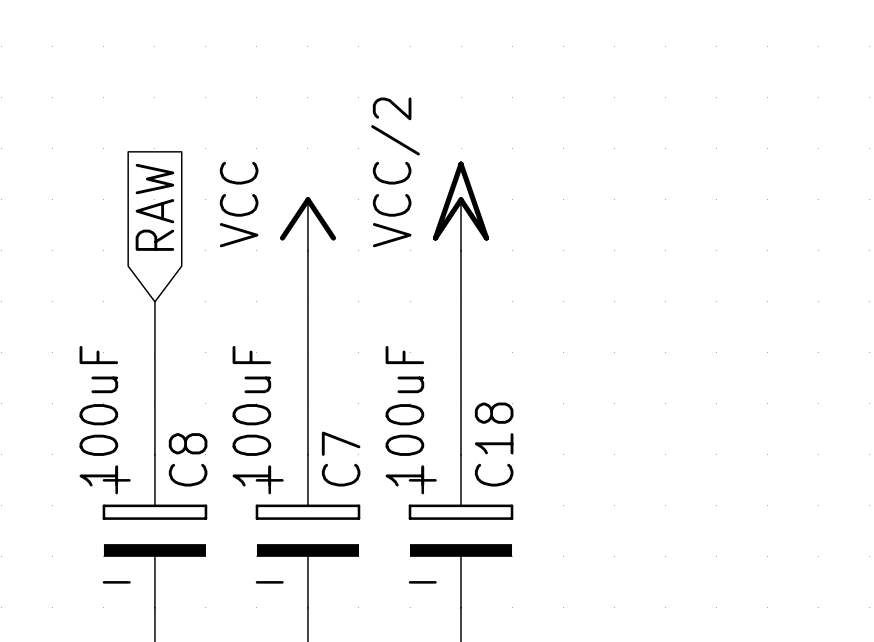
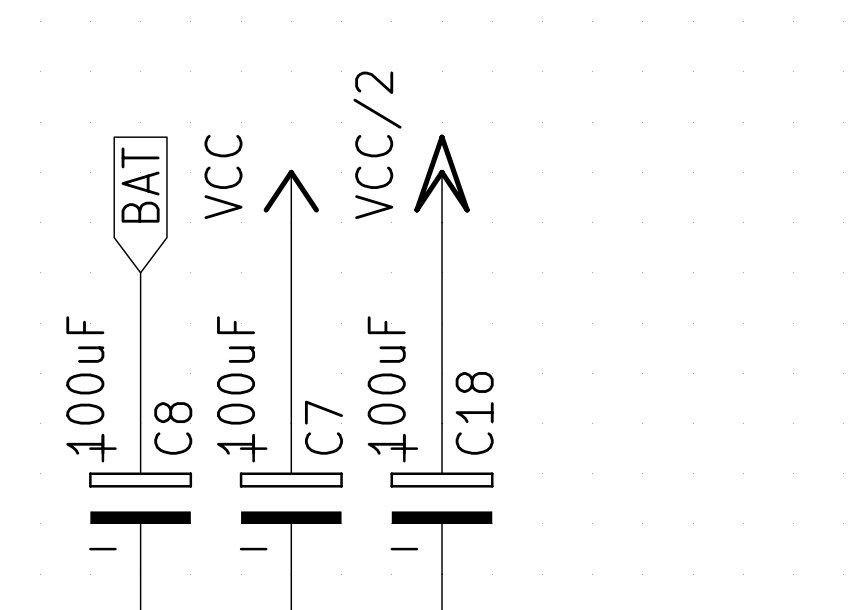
global label: RAW (154, 207) -> BAT (140, 185)

